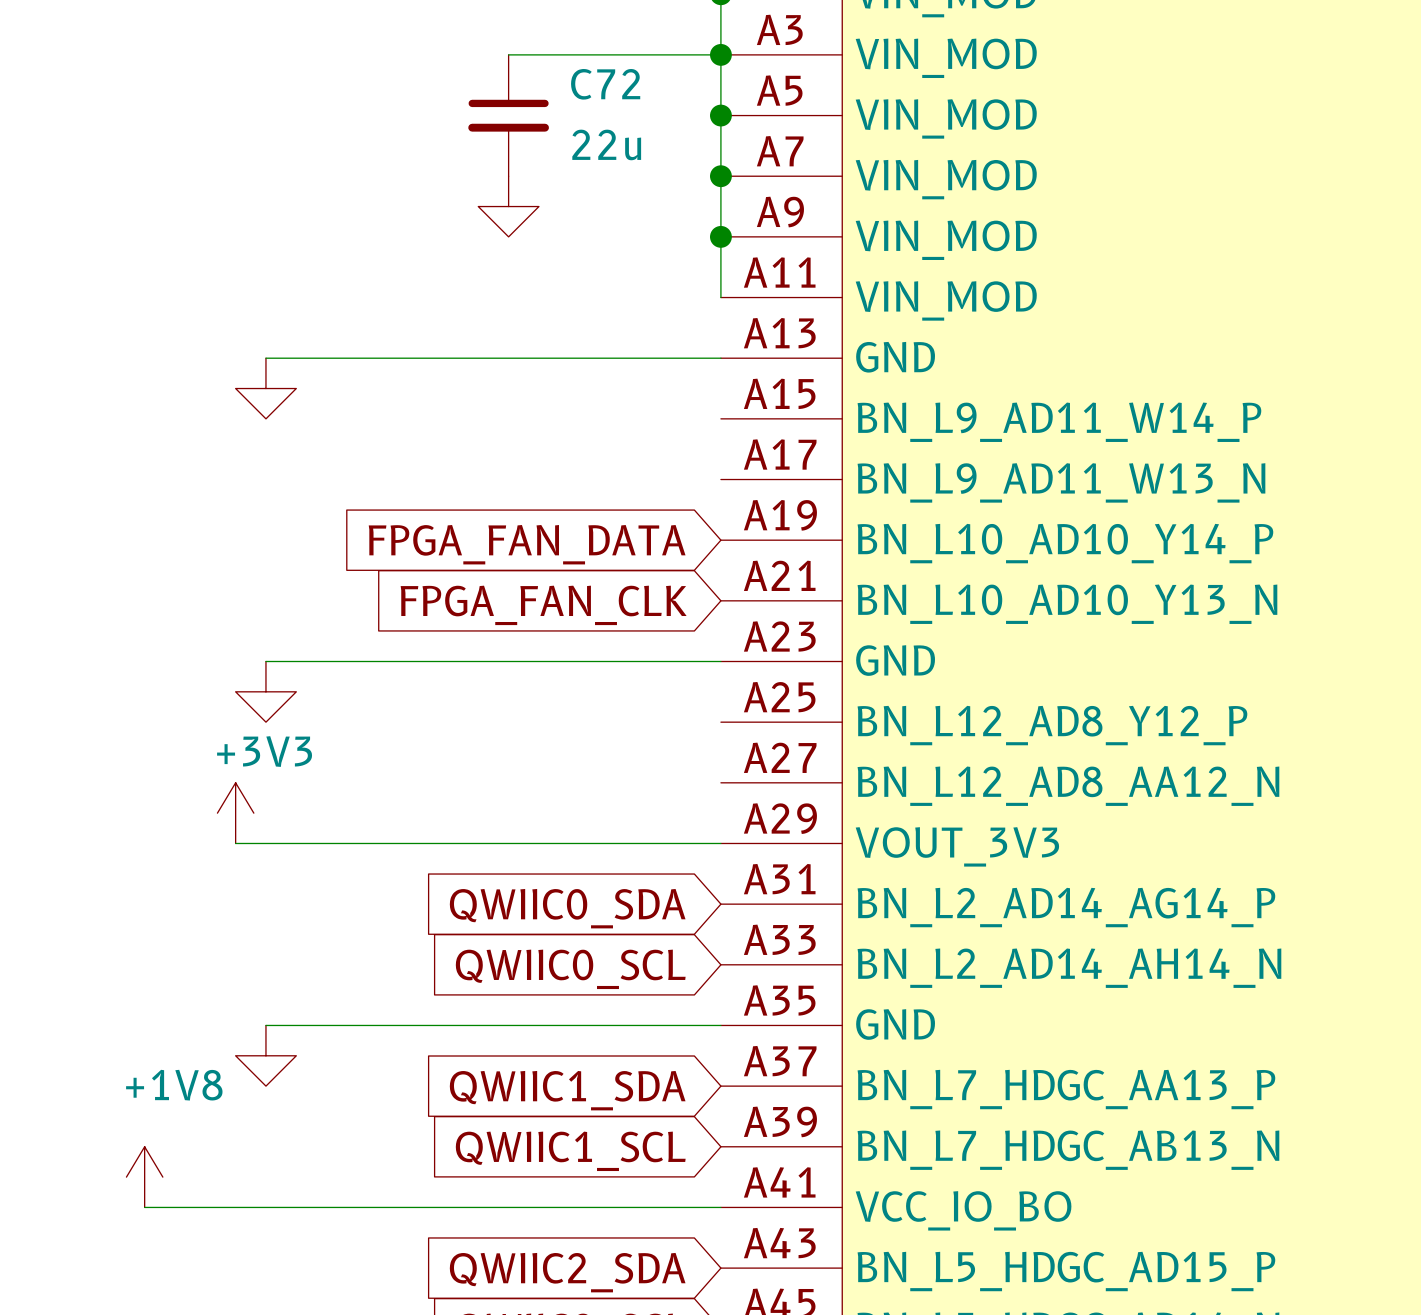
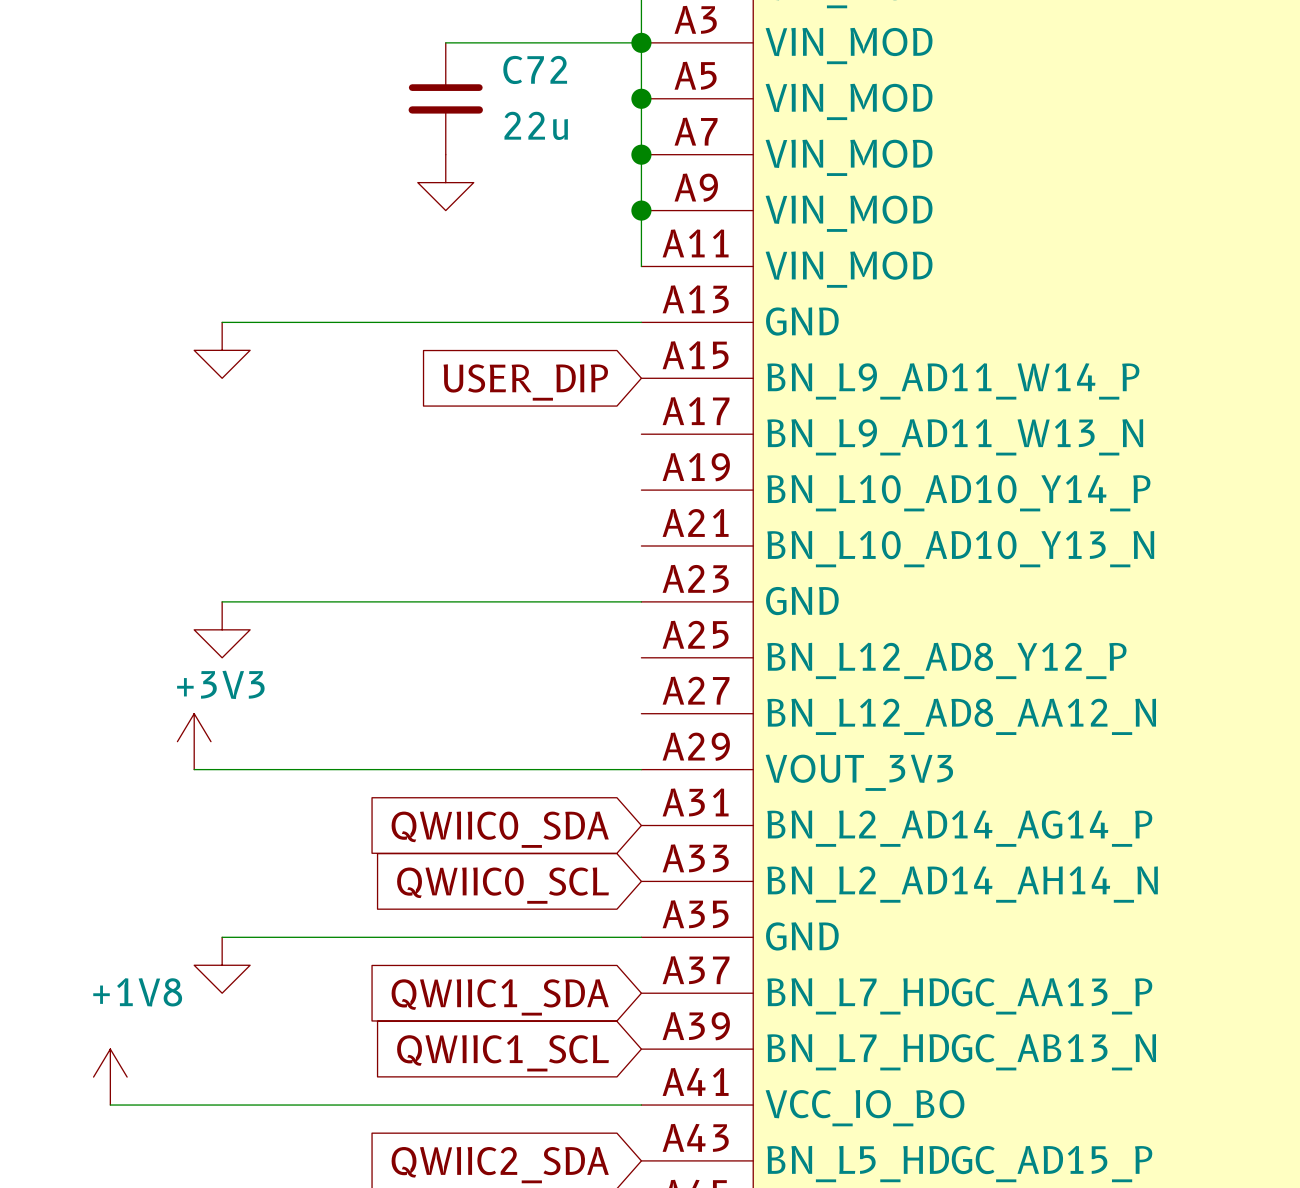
global label: none -> USER_DIP (525, 382)
global label: FPGA_FAN_DATA (527, 544) -> none
global label: FPGA_FAN_CLK (543, 605) -> none

